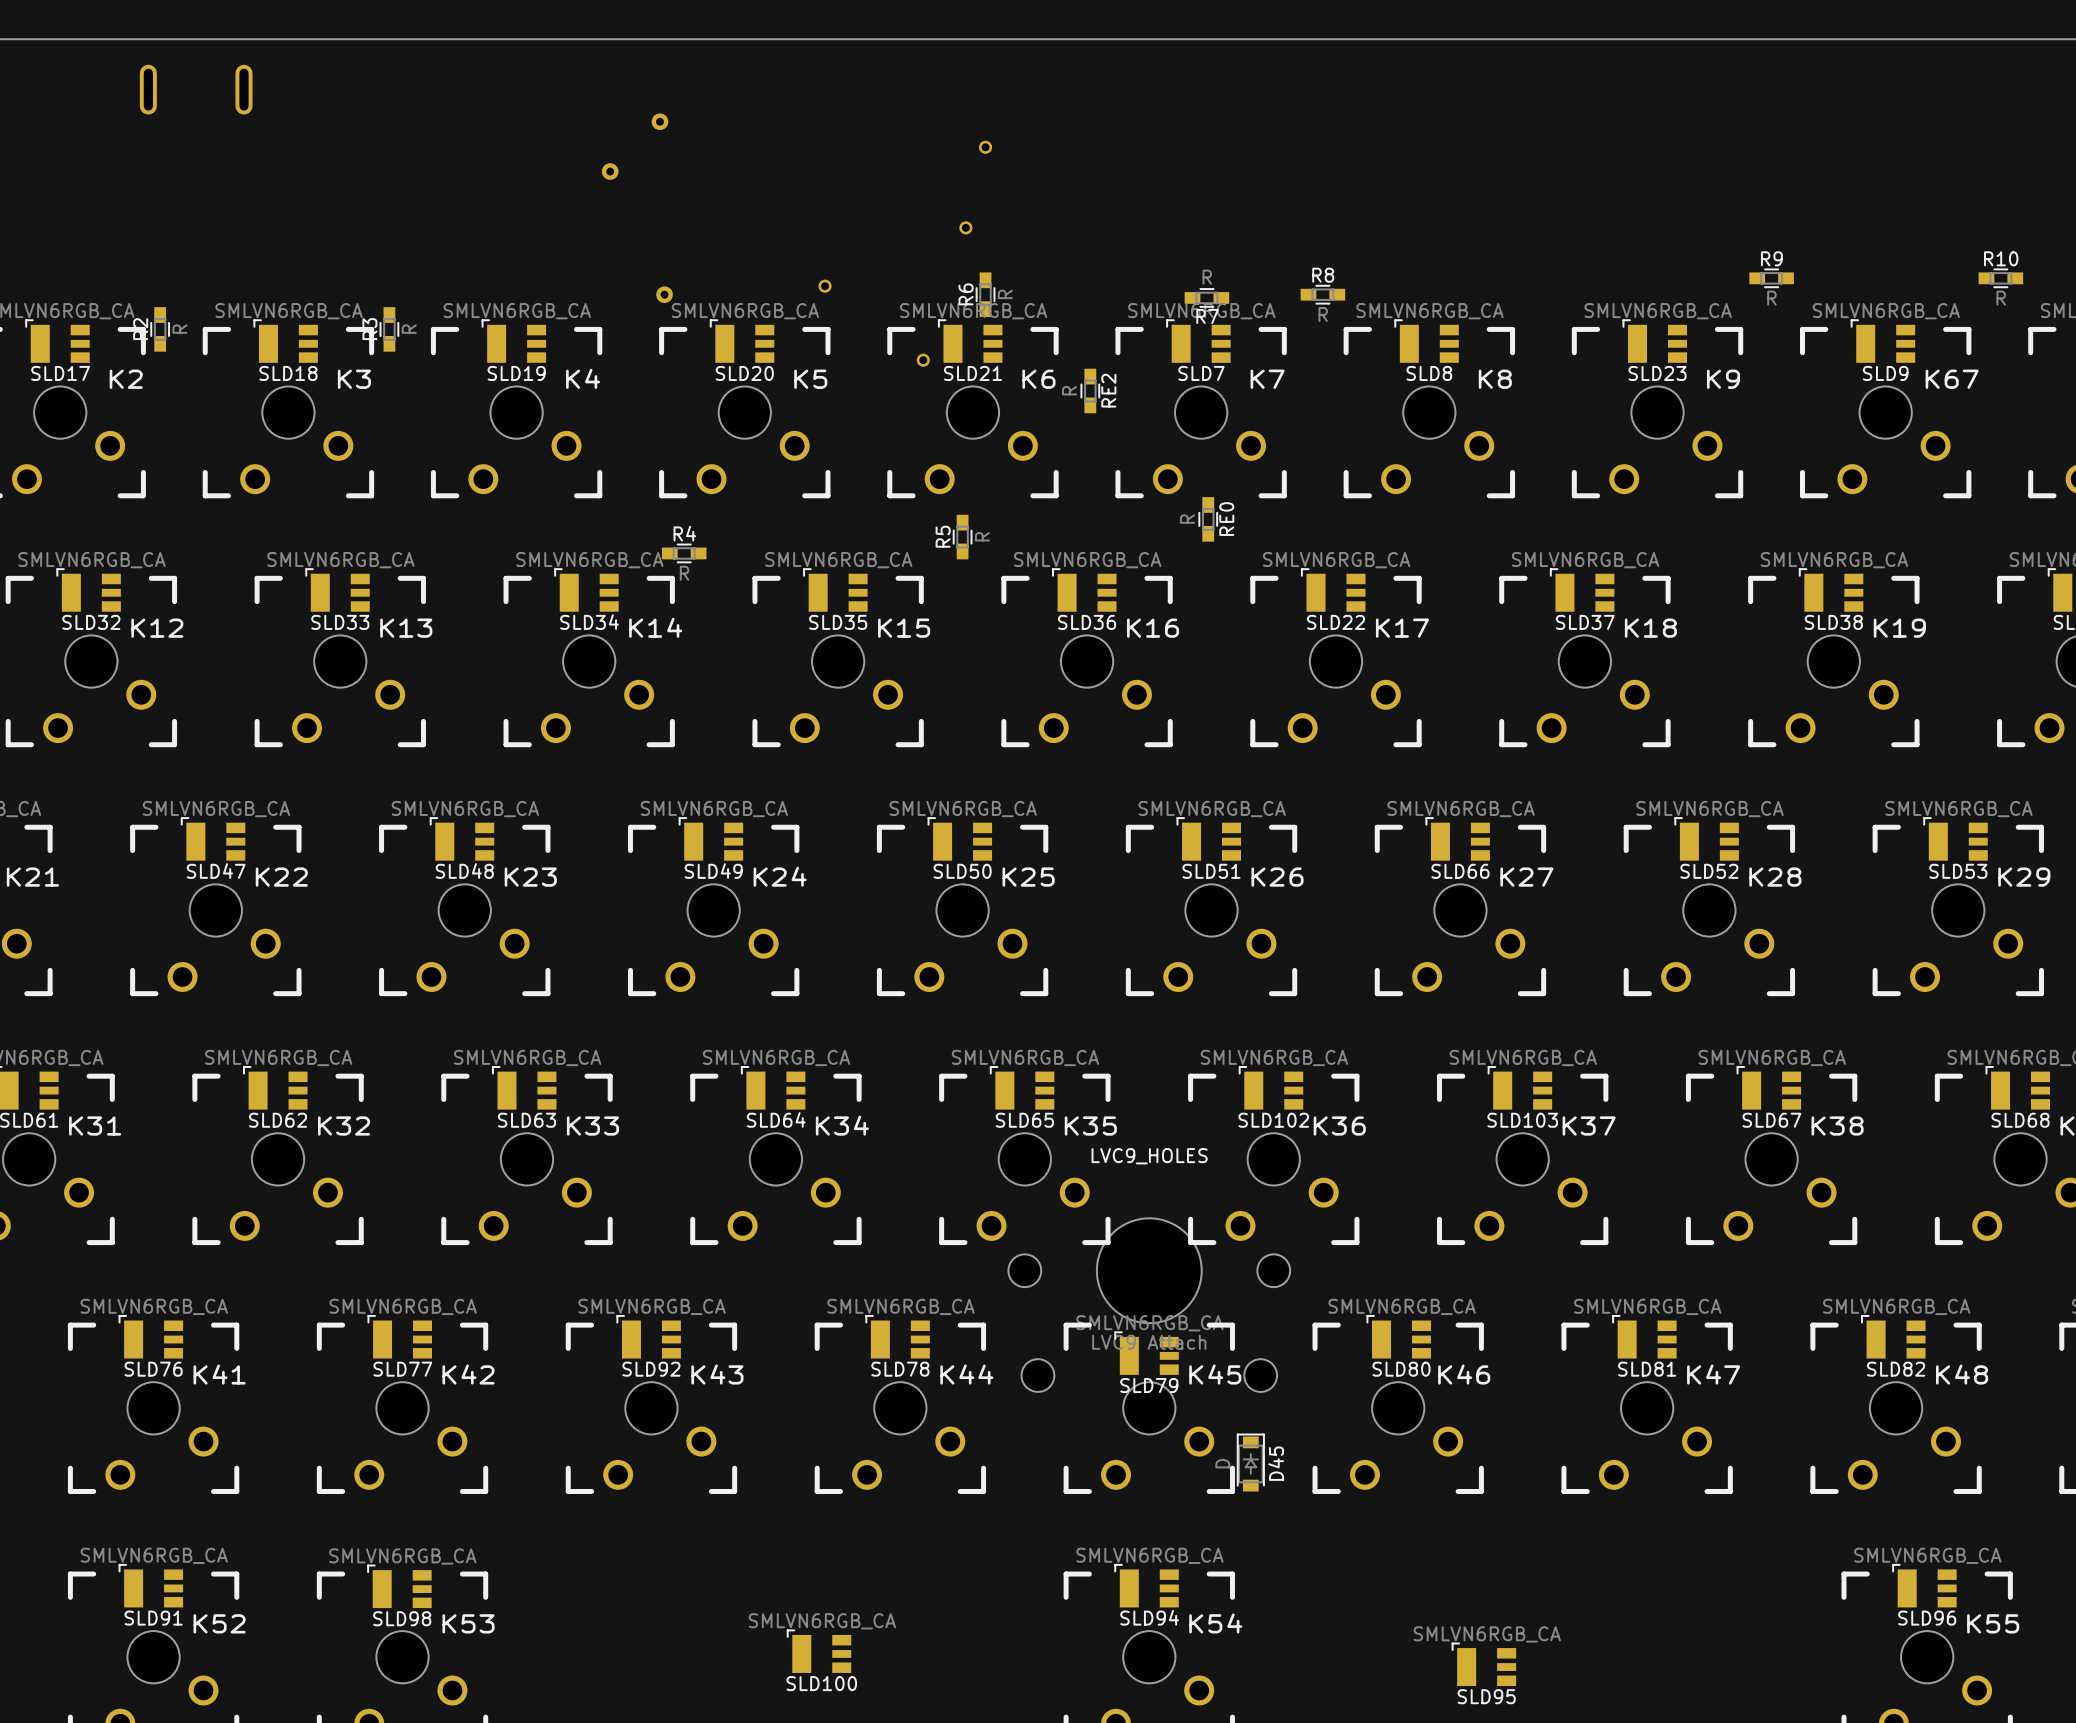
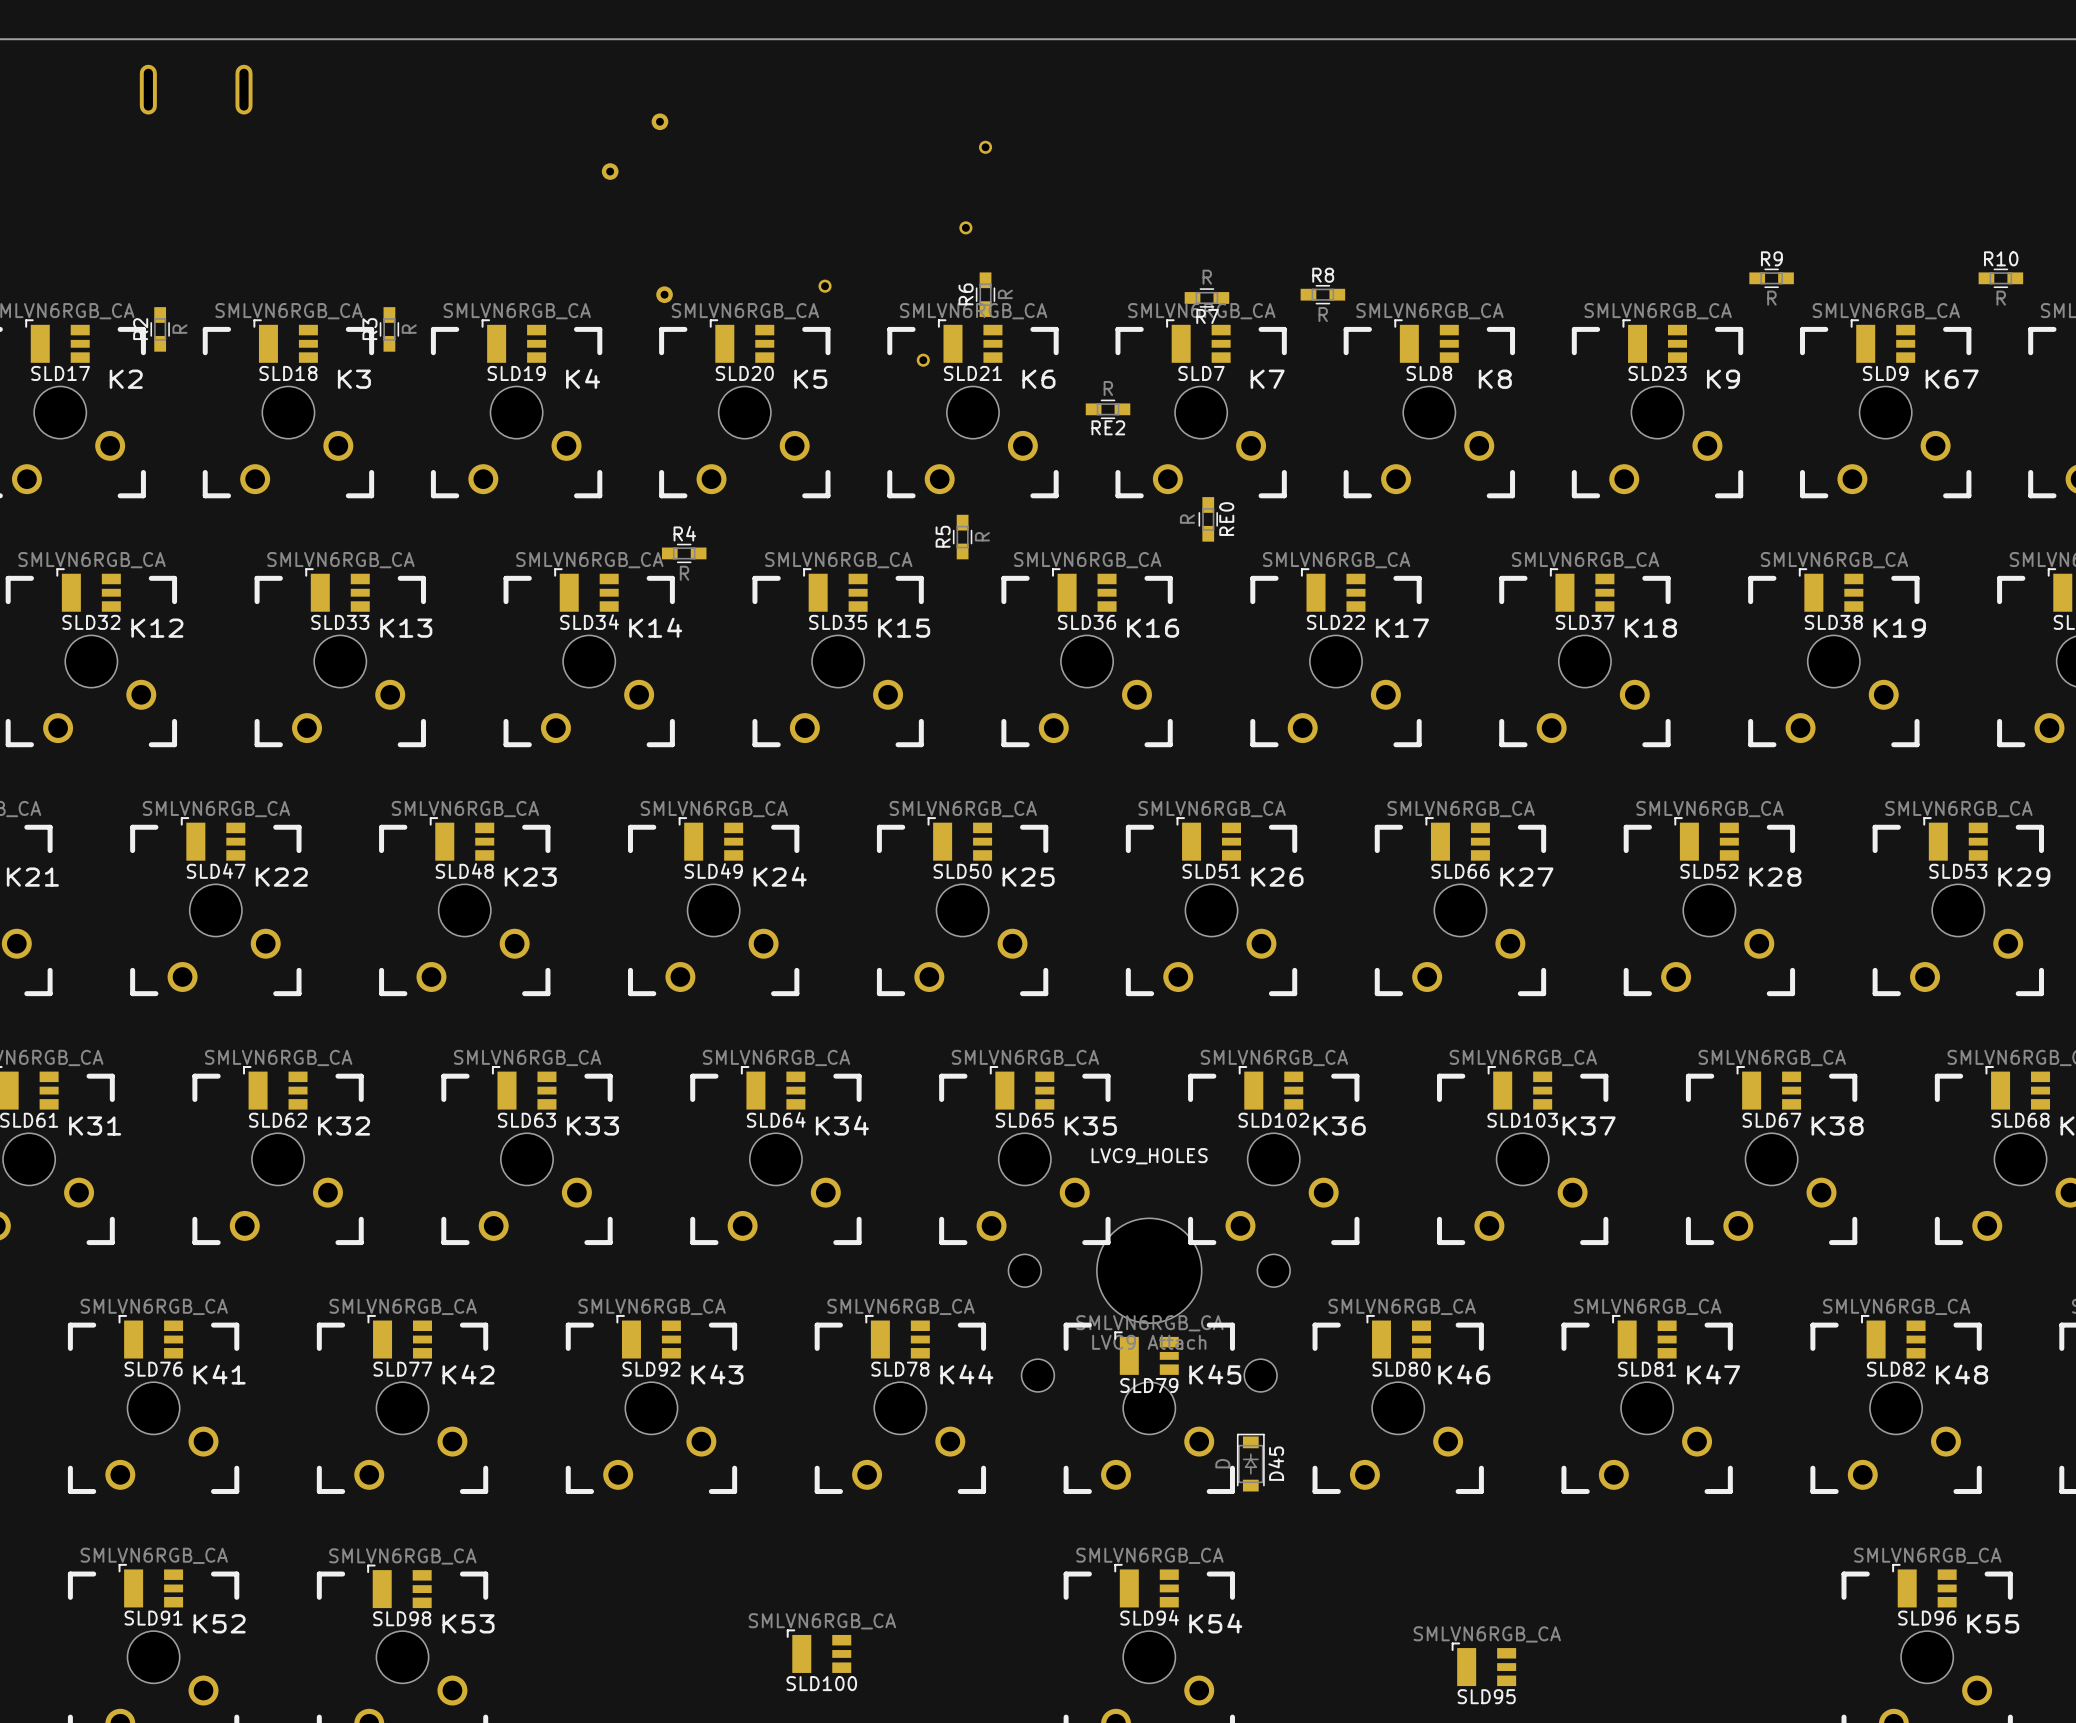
RE2 rotation: 0° (1090, 390) -> 90° clockwise (1108, 409)

